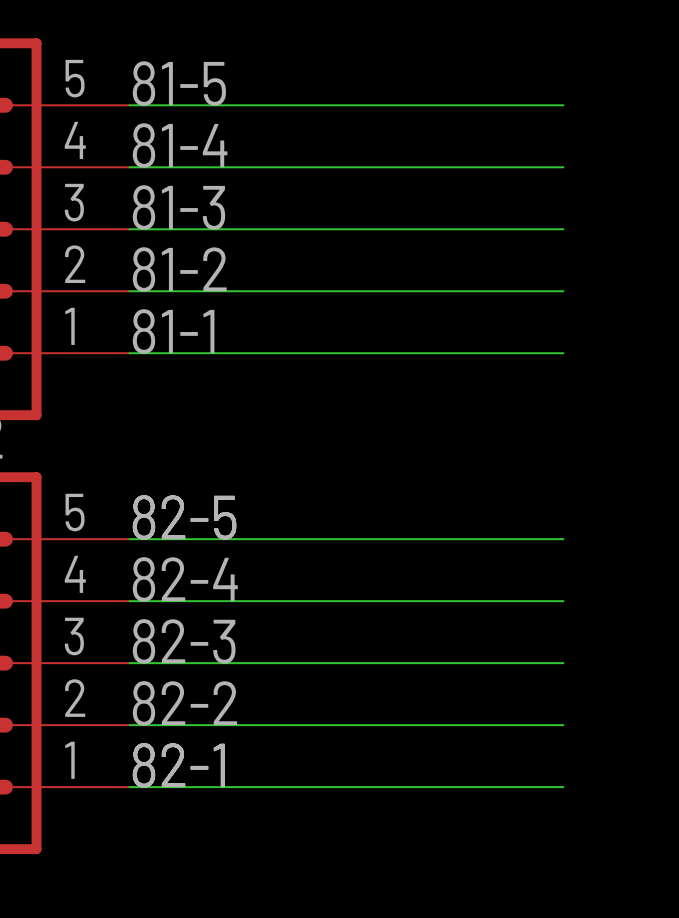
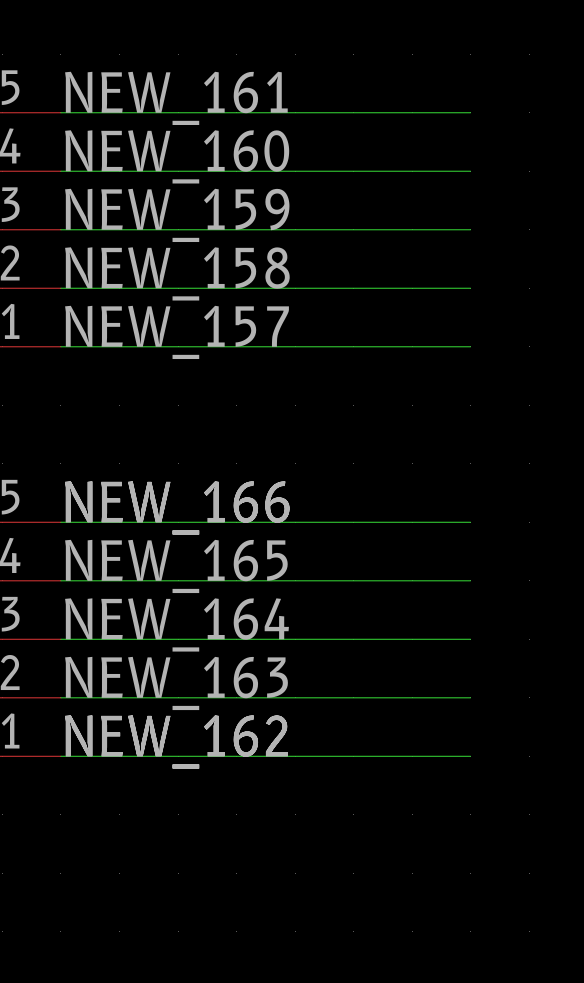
label: 81-5 (179, 83) -> NEW_161 (176, 98)
label: 81-4 (180, 145) -> NEW_160 (177, 156)
label: 81-3 (178, 207) -> NEW_159 (177, 215)
label: 81-2 (179, 269) -> NEW_158 (177, 273)
label: 81-1 (173, 331) -> NEW_157 (177, 332)
label: 82-5 (184, 517) -> NEW_166 (177, 507)
label: 82-4 (185, 579) -> NEW_165 (176, 566)
label: 82-3 (184, 641) -> NEW_164 (177, 624)
label: 82-2 (184, 703) -> NEW_163 (176, 683)
label: 82-1 (178, 765) -> NEW_162 (176, 741)

